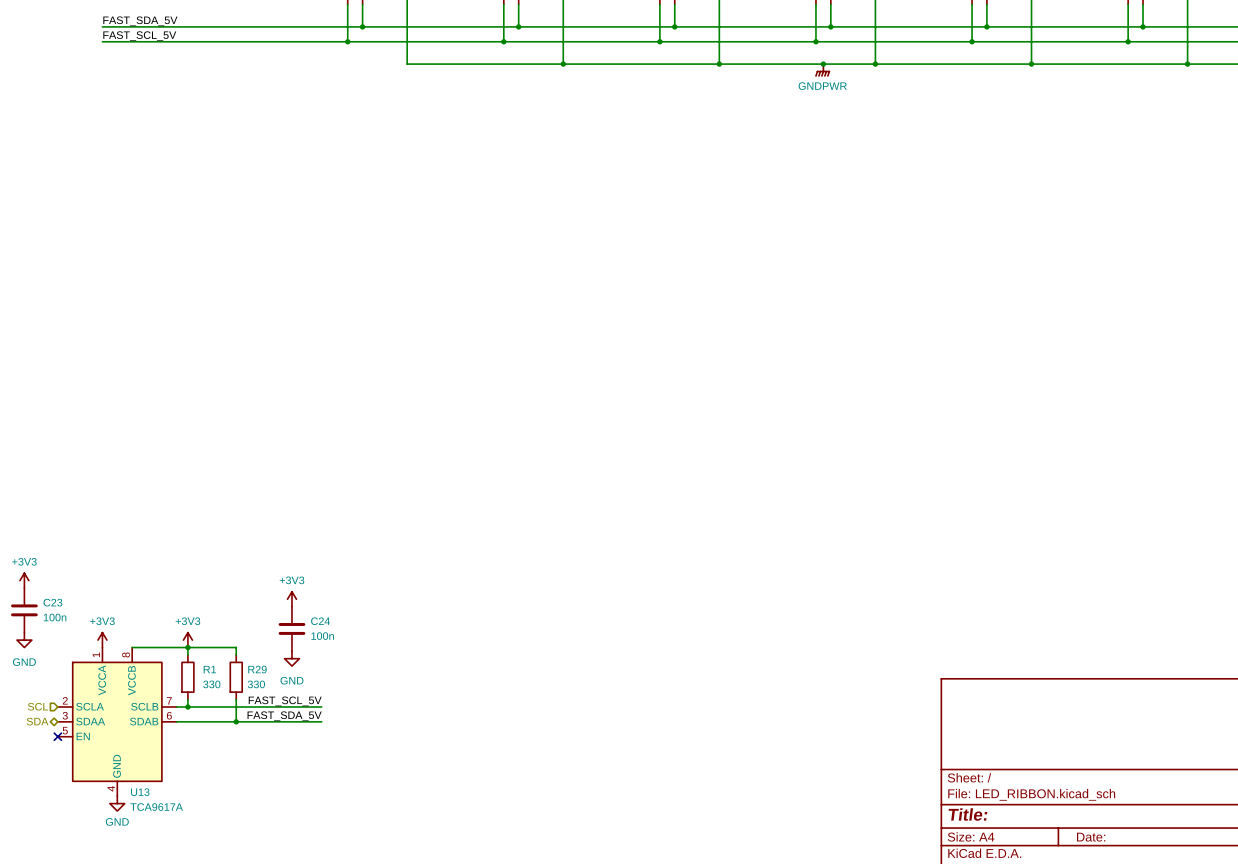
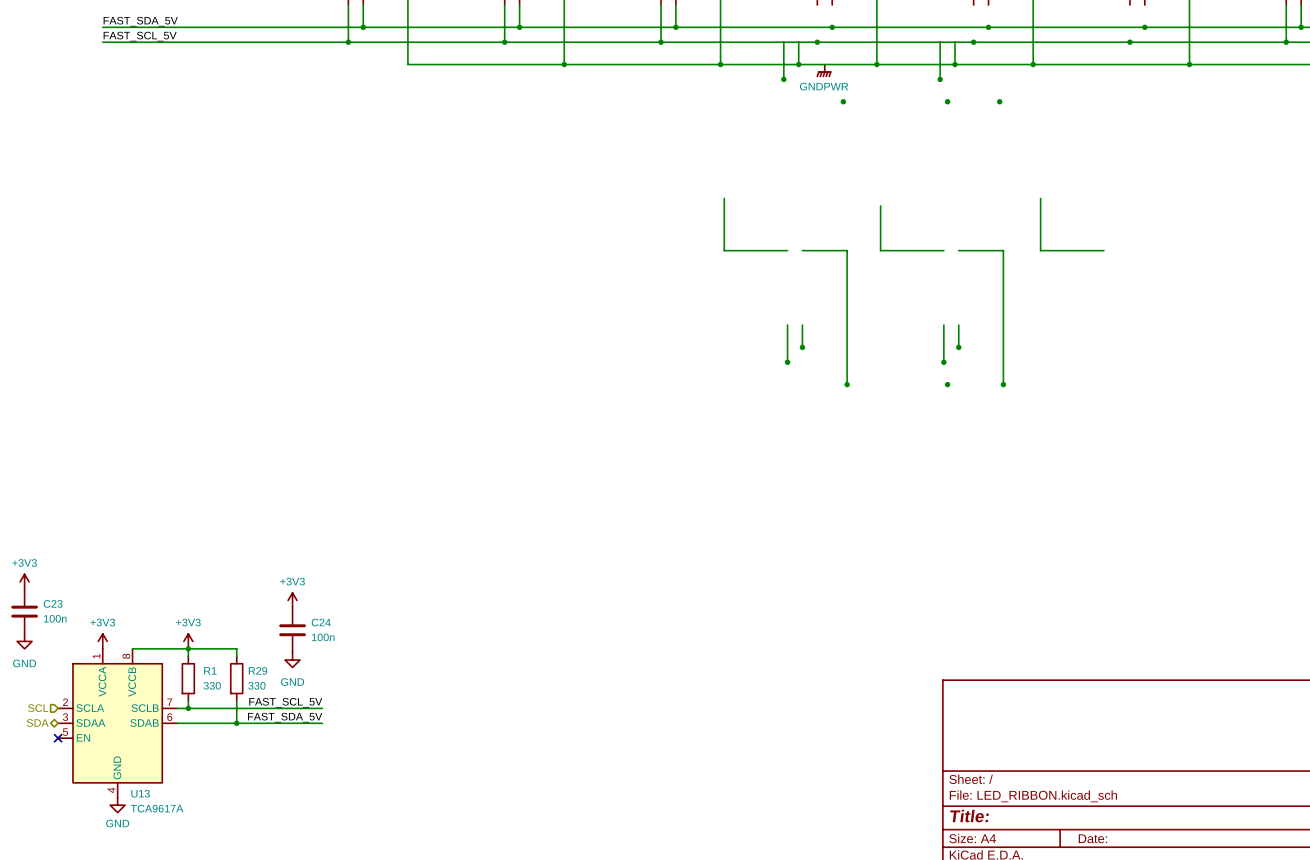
wire: (815, 4) (815, 41) -> (783, 42) (783, 79)
wire: (830, 4) (830, 26) -> (798, 42) (798, 64)
wire: (972, 4) (972, 41) -> (940, 42) (940, 79)
wire: (986, 4) (986, 26) -> (955, 42) (955, 64)
wire: (1128, 4) (1128, 41) -> none
wire: (1143, 4) (1143, 26) -> none
junction: none -> (798, 64)
junction: (823, 64) -> none
junction: none -> (955, 64)
junction: none -> (783, 79)
junction: none -> (940, 79)
junction: none -> (843, 101)
junction: none -> (947, 101)
junction: none -> (999, 101)
wire: none -> (724, 198) (724, 250) (787, 250)
wire: none -> (1040, 198) (1040, 250) (1103, 250)
wire: none -> (880, 205) (880, 250) (943, 250)
wire: none -> (802, 250) (847, 250) (847, 384)
wire: none -> (958, 250) (1003, 250) (1003, 384)
wire: none -> (787, 325) (787, 362)
wire: none -> (802, 325) (802, 347)
wire: none -> (943, 325) (943, 362)
wire: none -> (958, 325) (958, 347)
junction: none -> (802, 347)
junction: none -> (958, 347)
junction: none -> (787, 362)
junction: none -> (943, 362)
junction: none -> (847, 384)
junction: none -> (947, 384)
junction: none -> (1003, 384)

